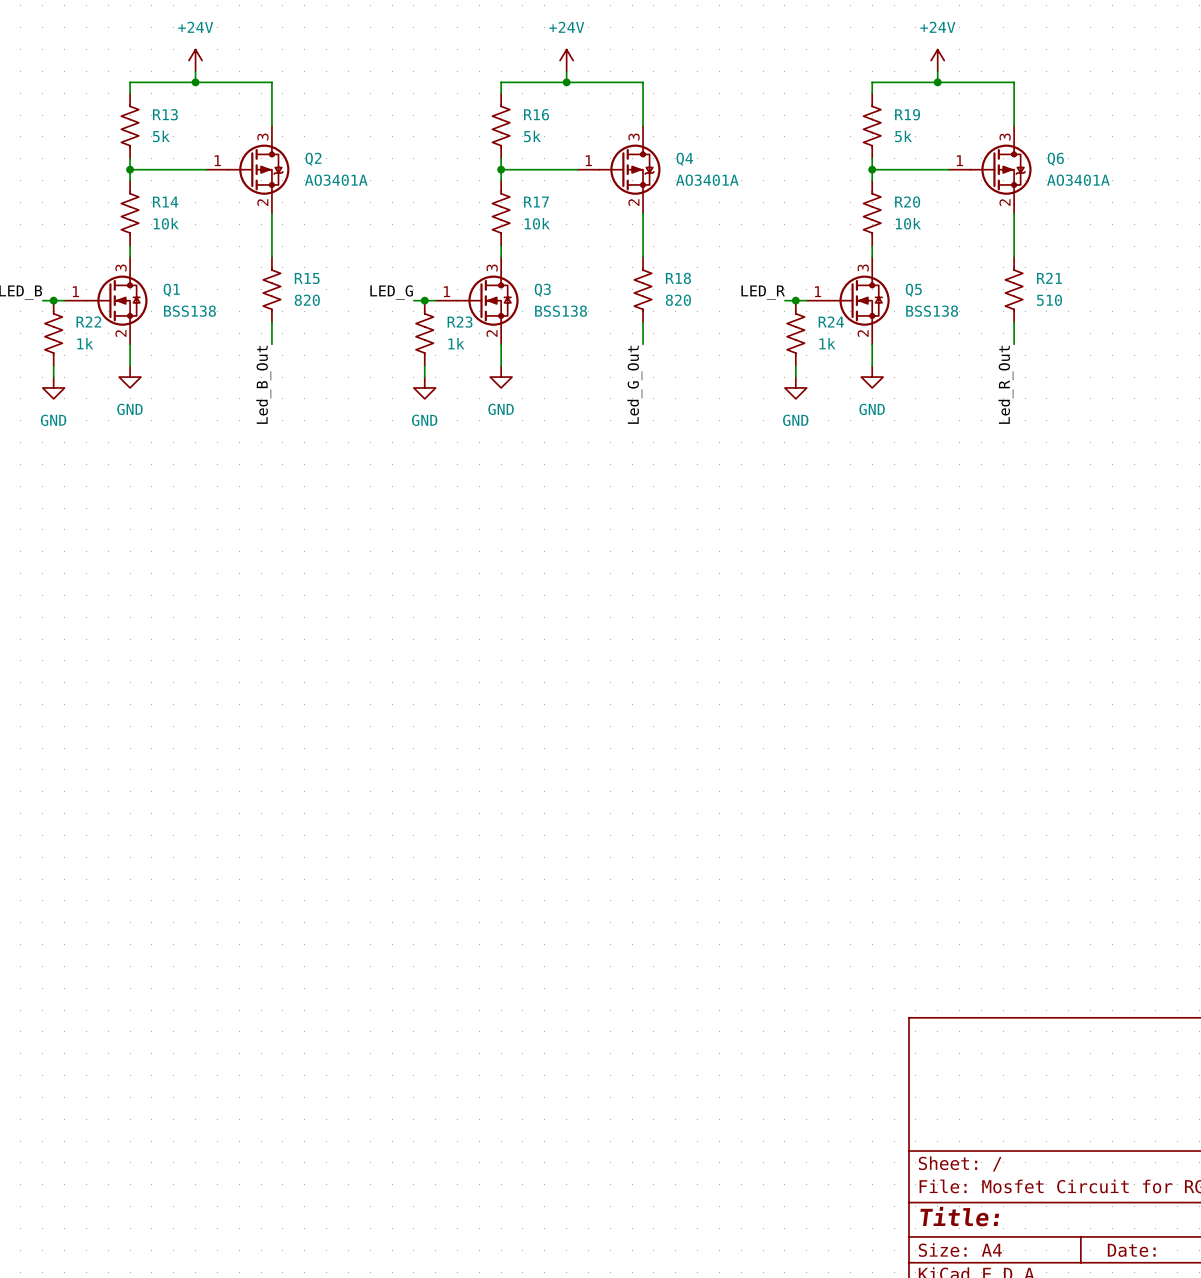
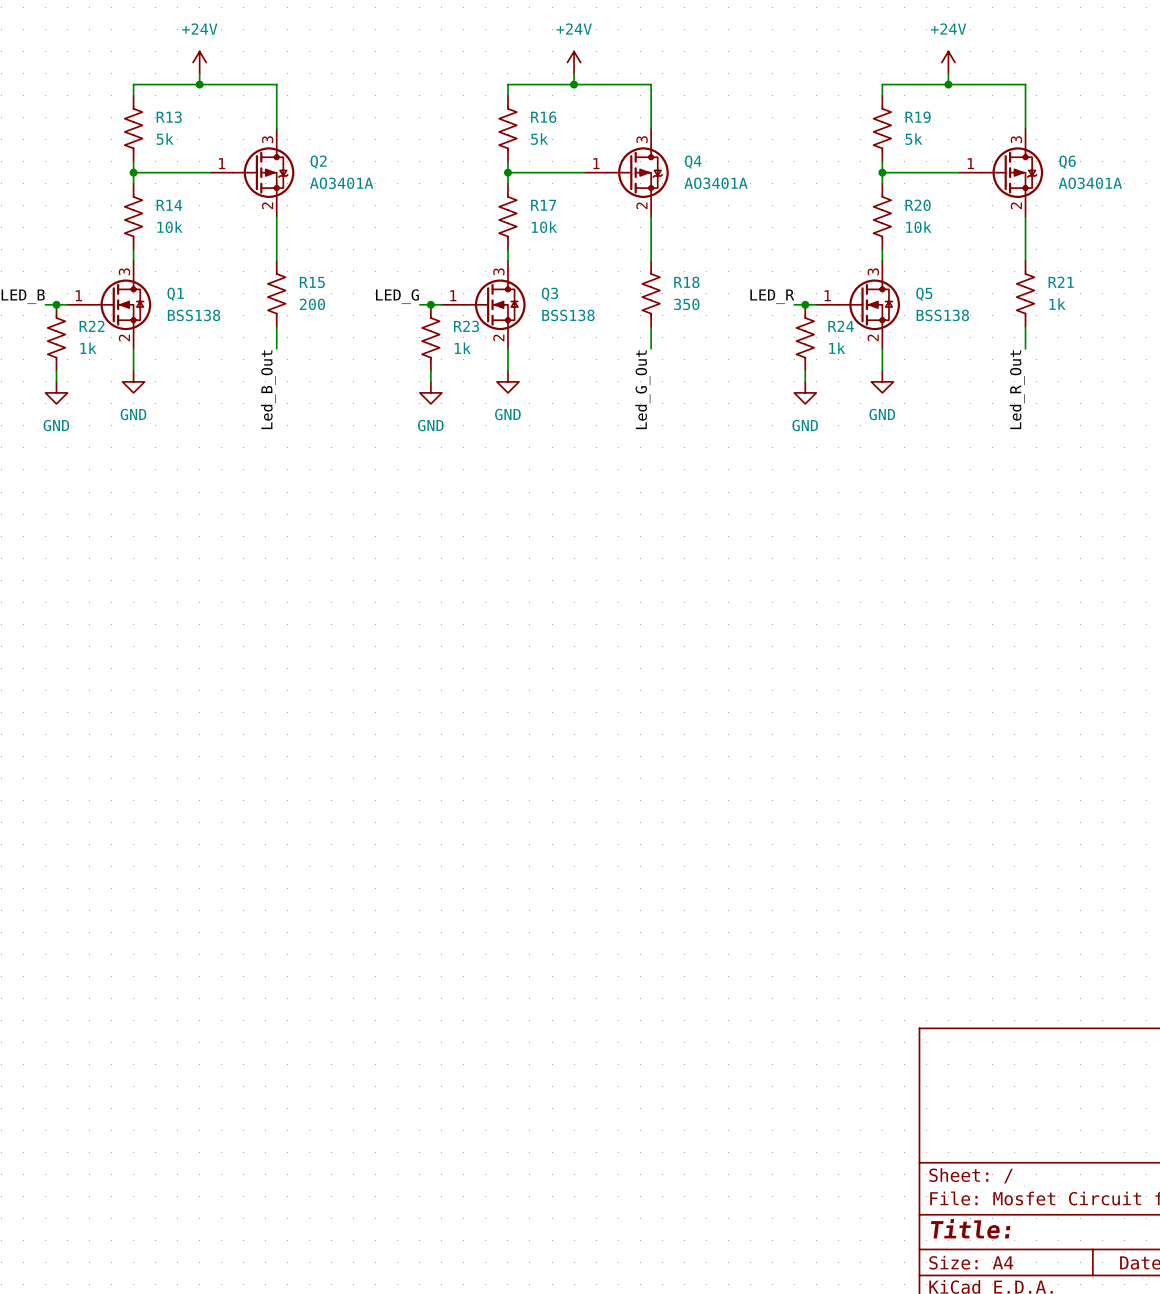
R15 value: 820 (307, 300) -> 200 (312, 304)
R18 value: 820 (678, 300) -> 350 (686, 304)
R21 value: 510 (1049, 300) -> 1k (1057, 304)

